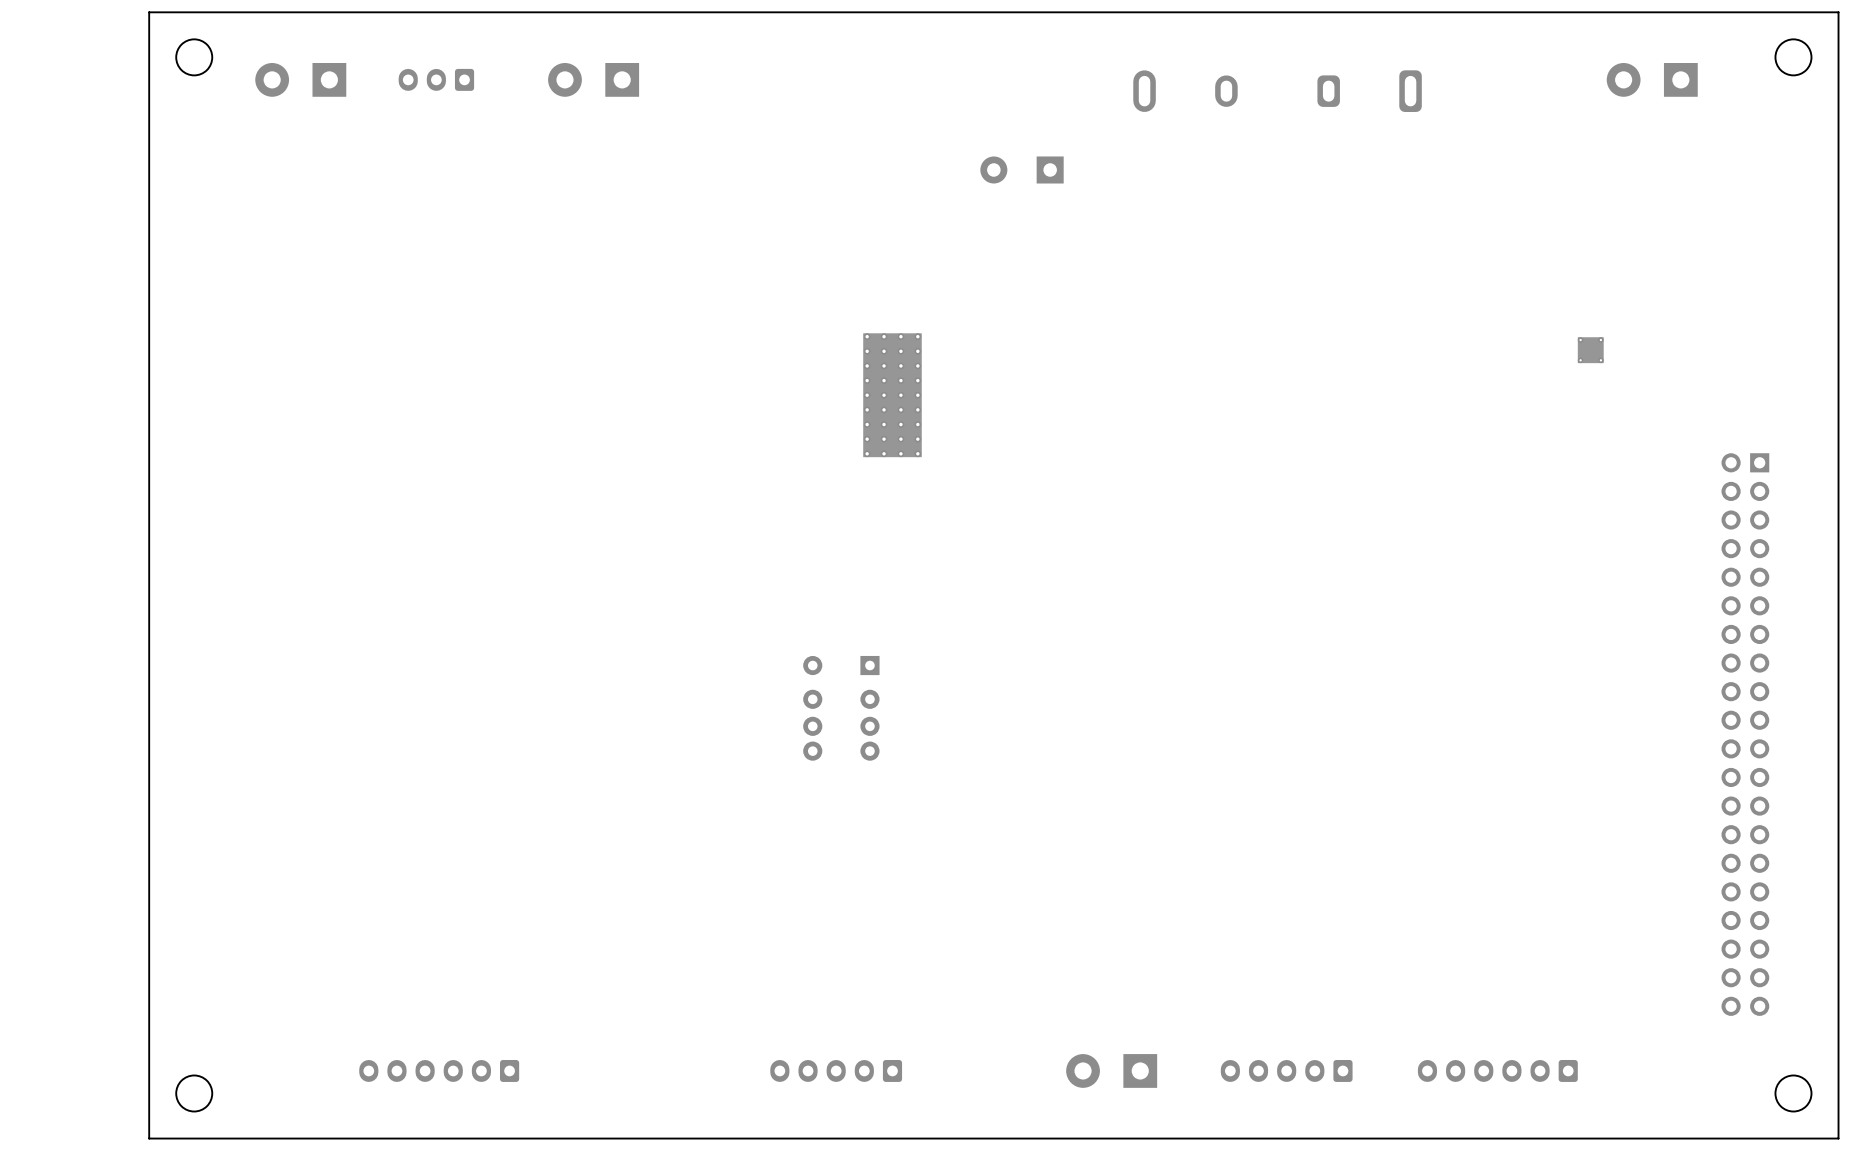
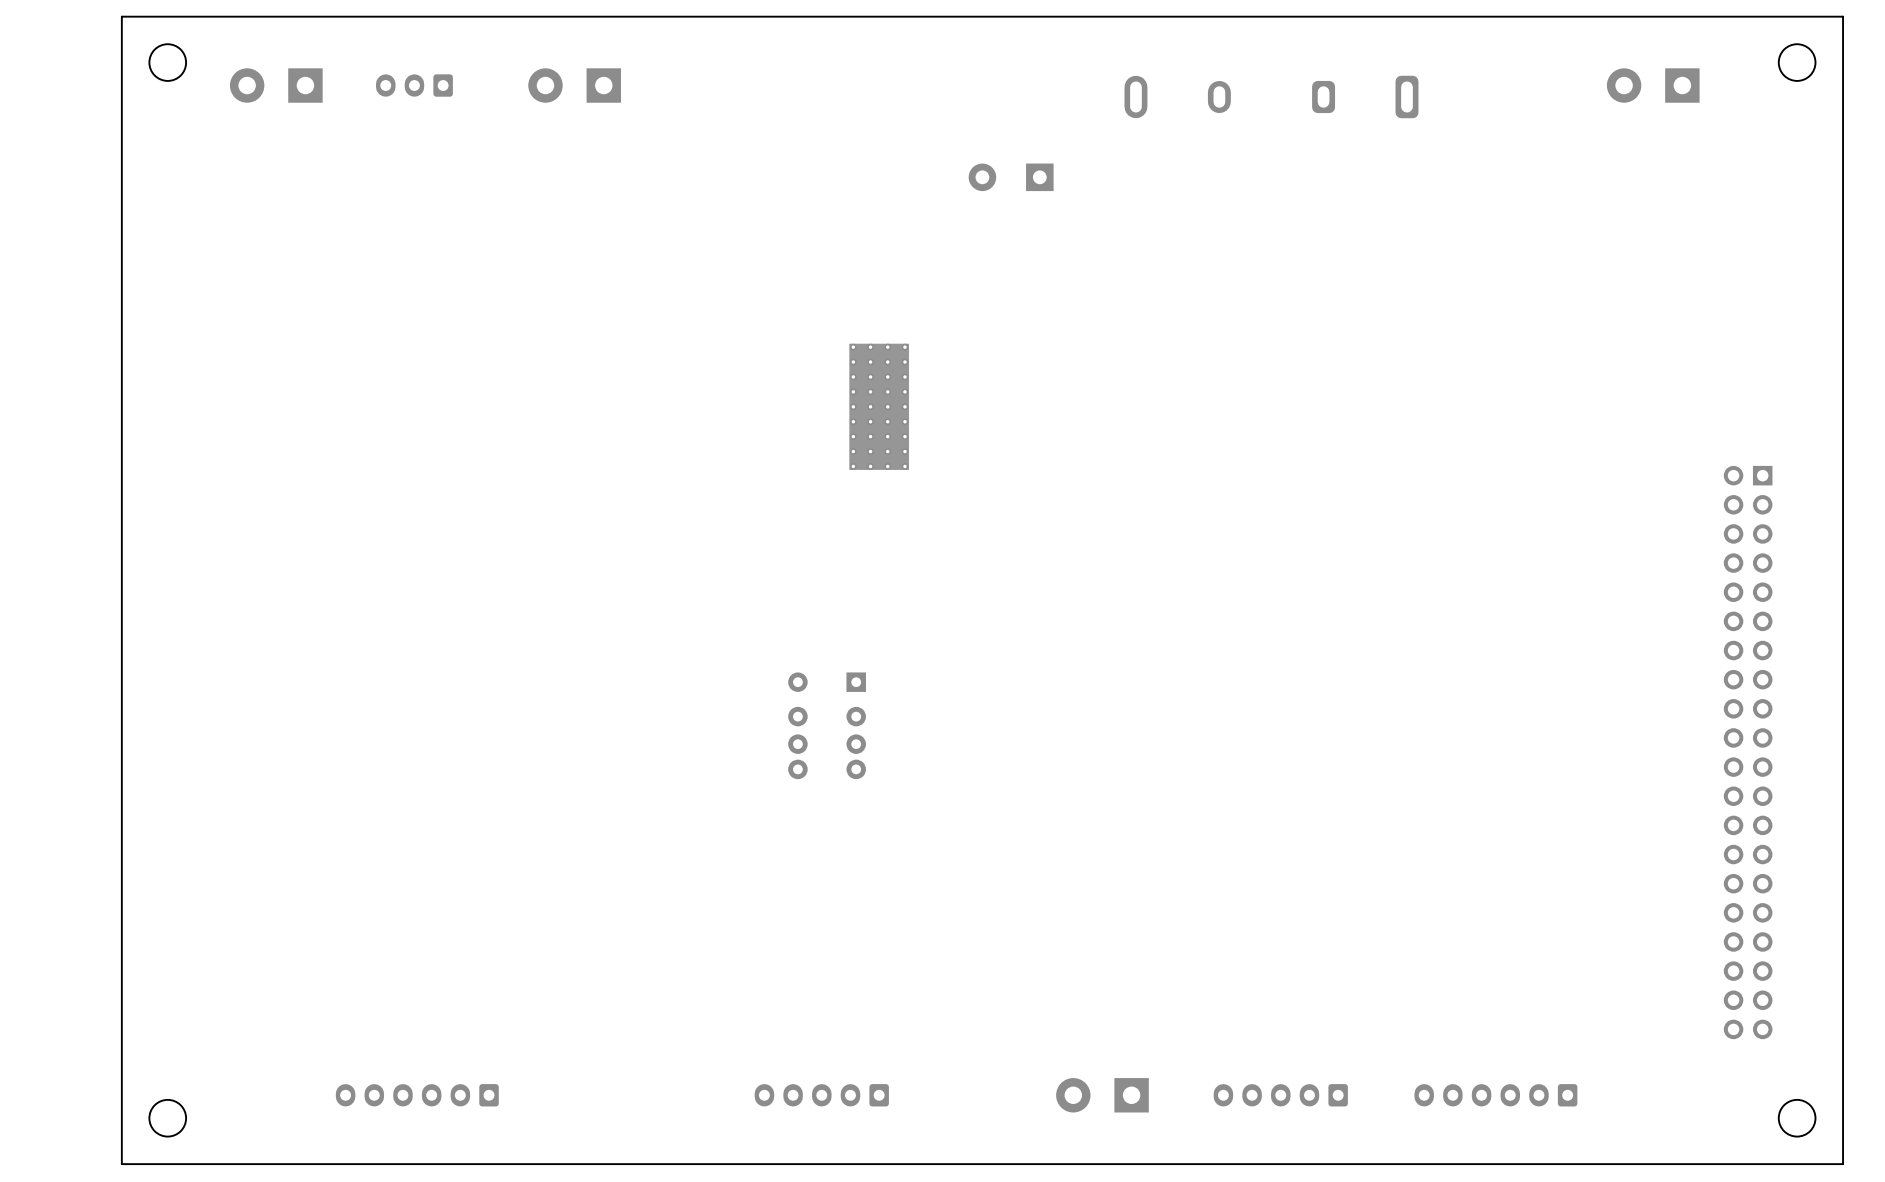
part: (1590, 350) -> none

